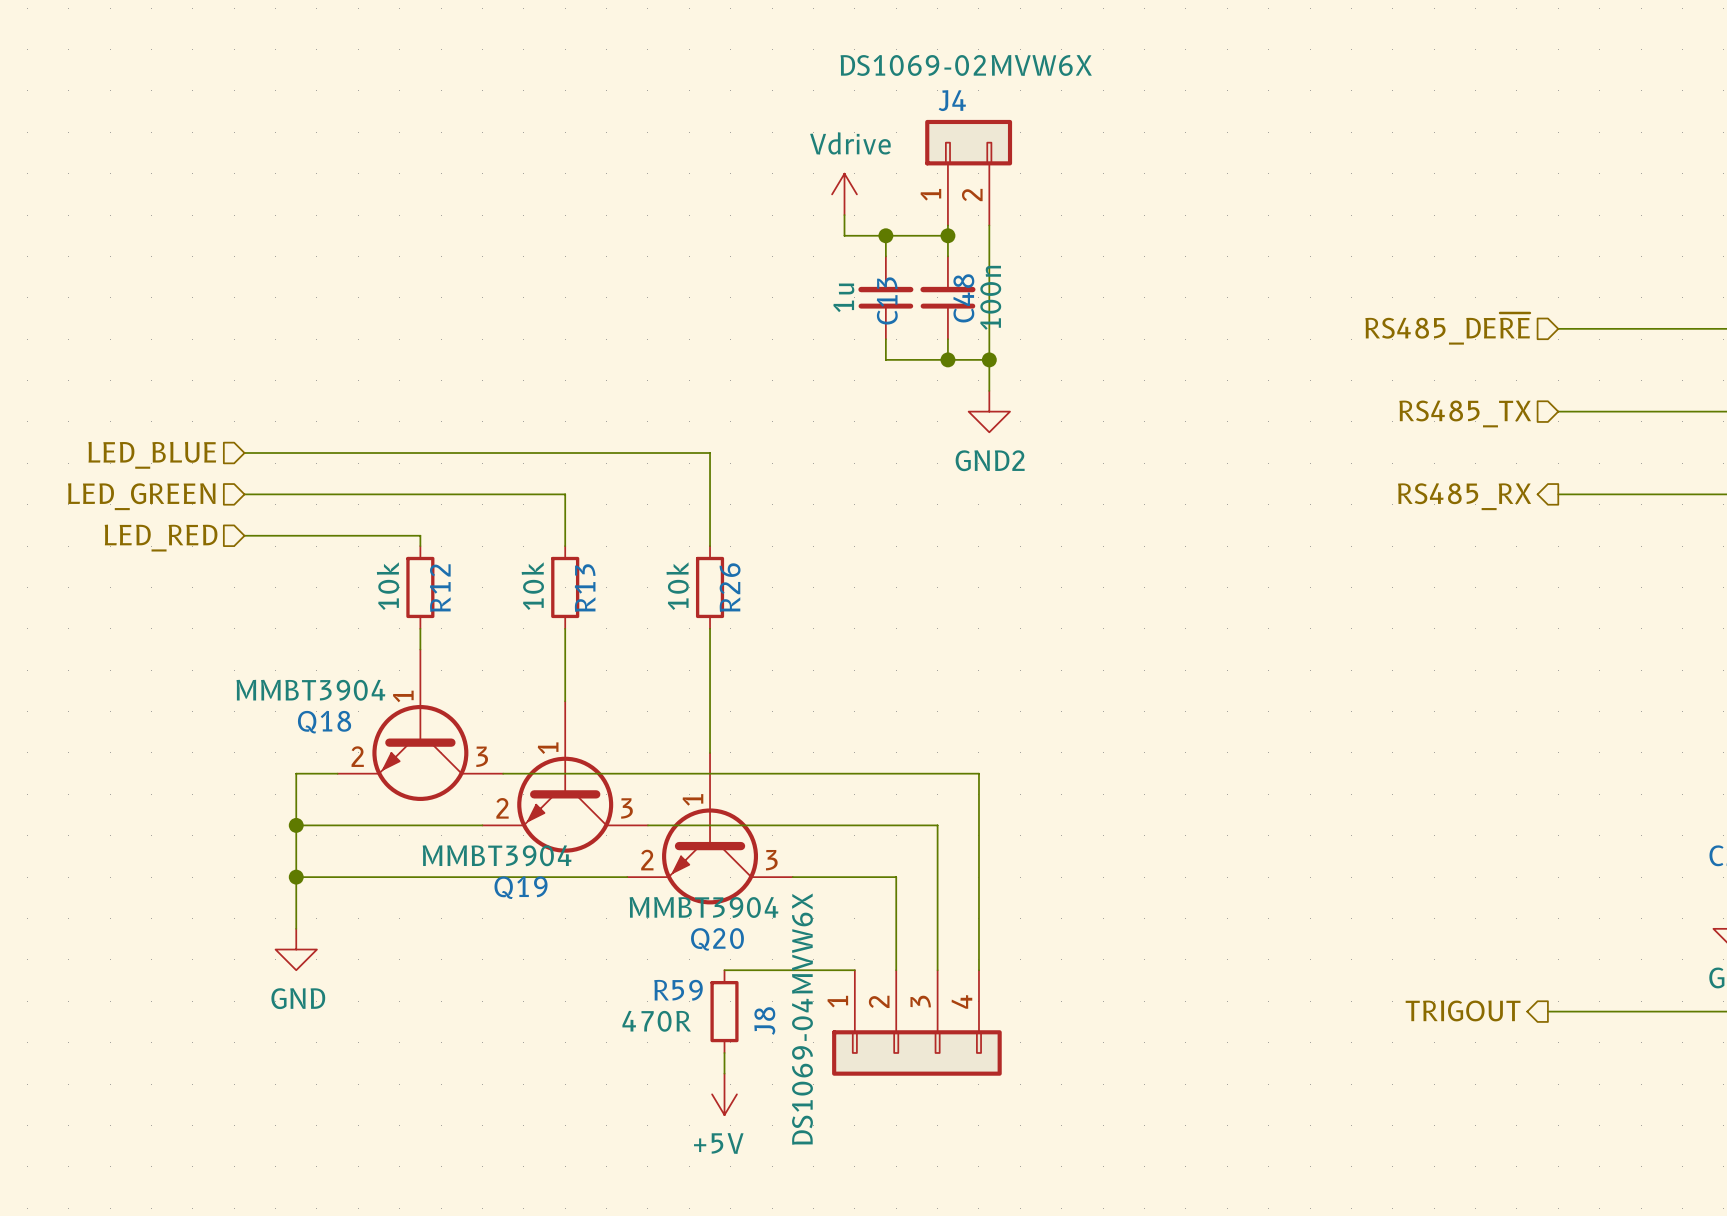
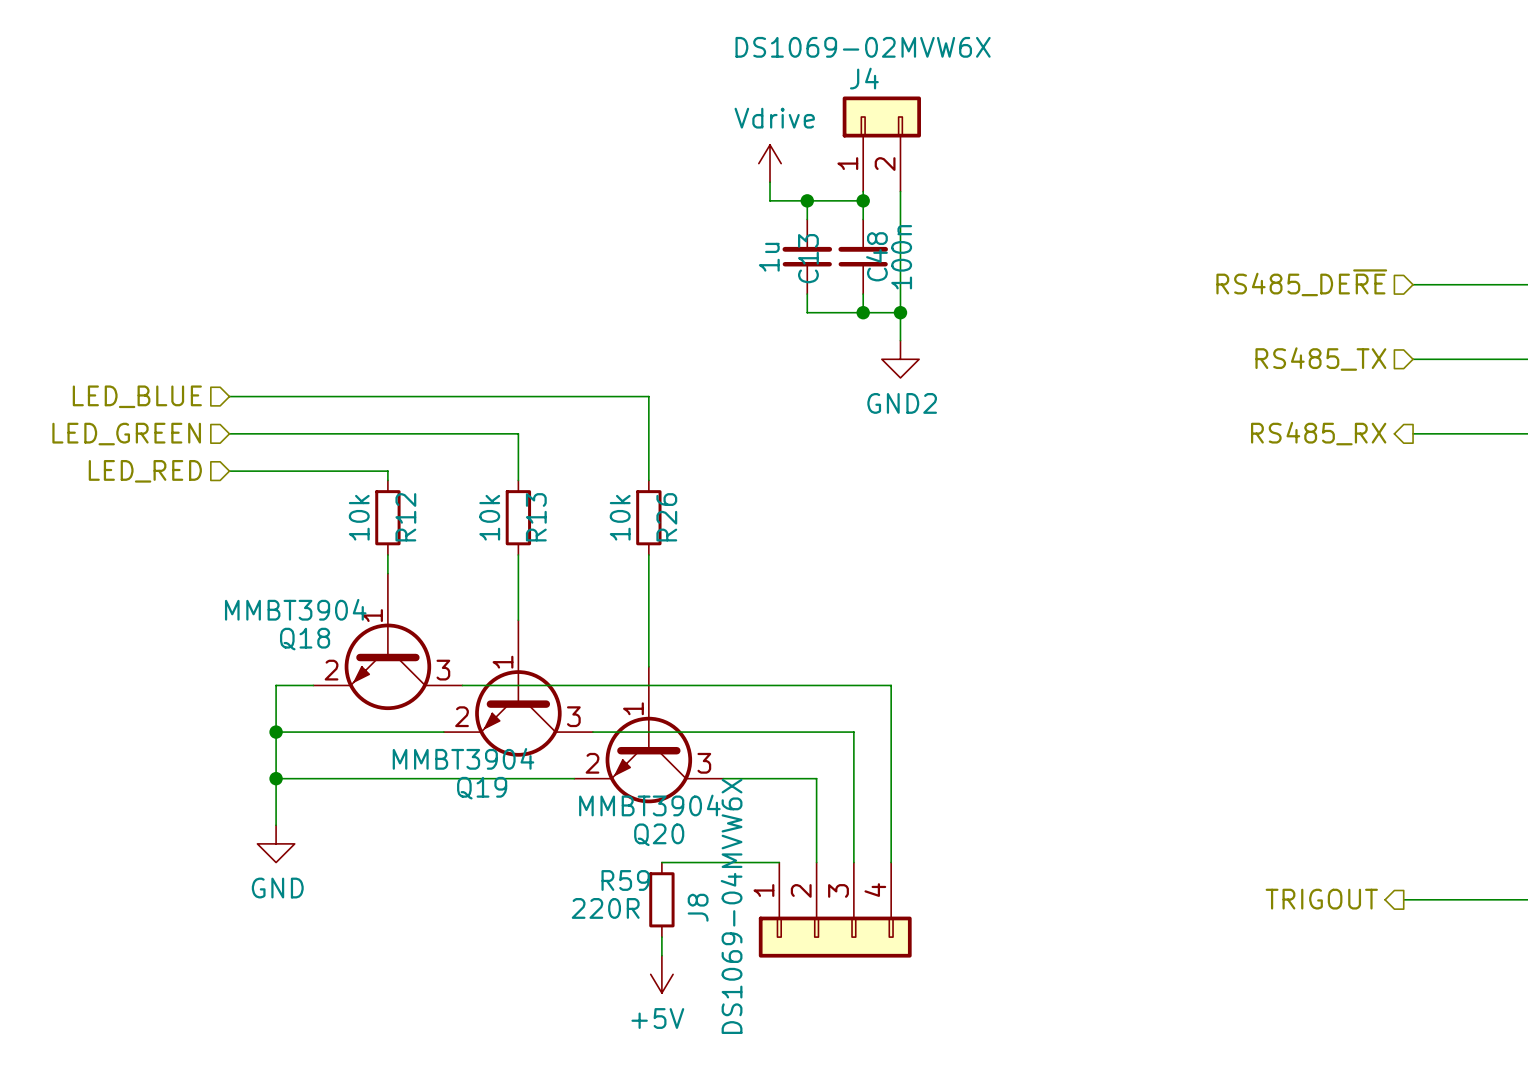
R59 value: 470R (656, 1021) -> 220R (605, 908)

